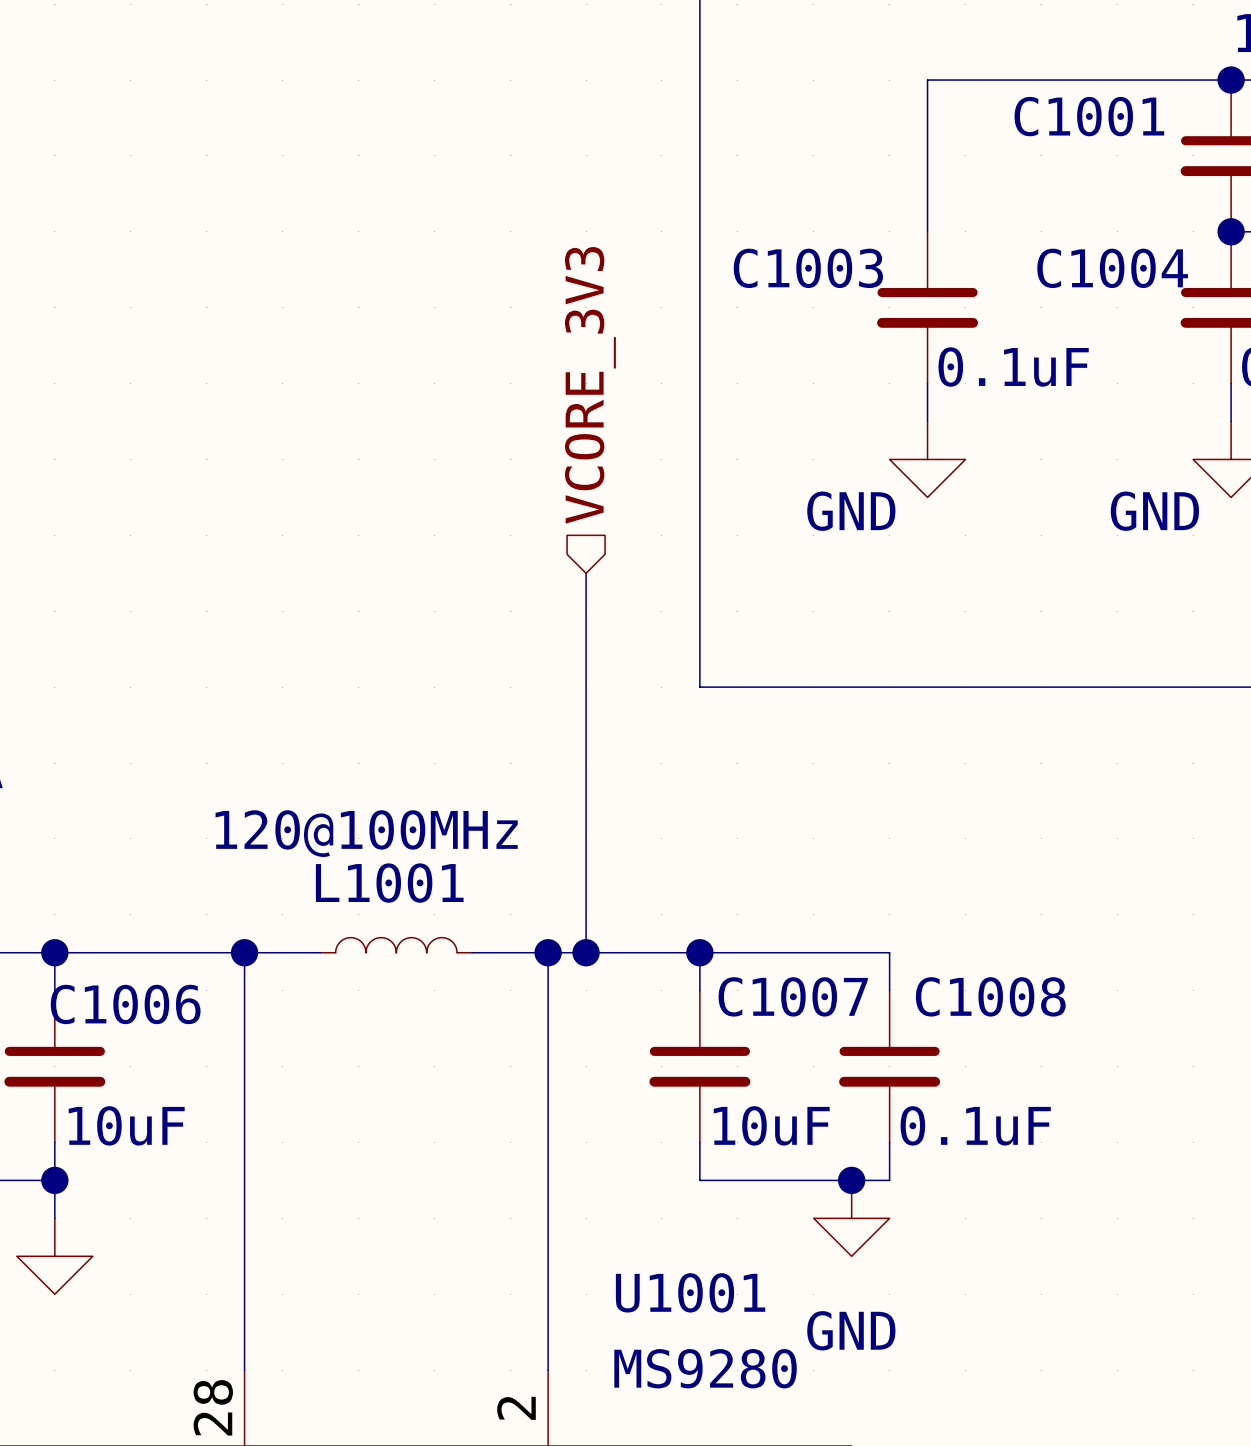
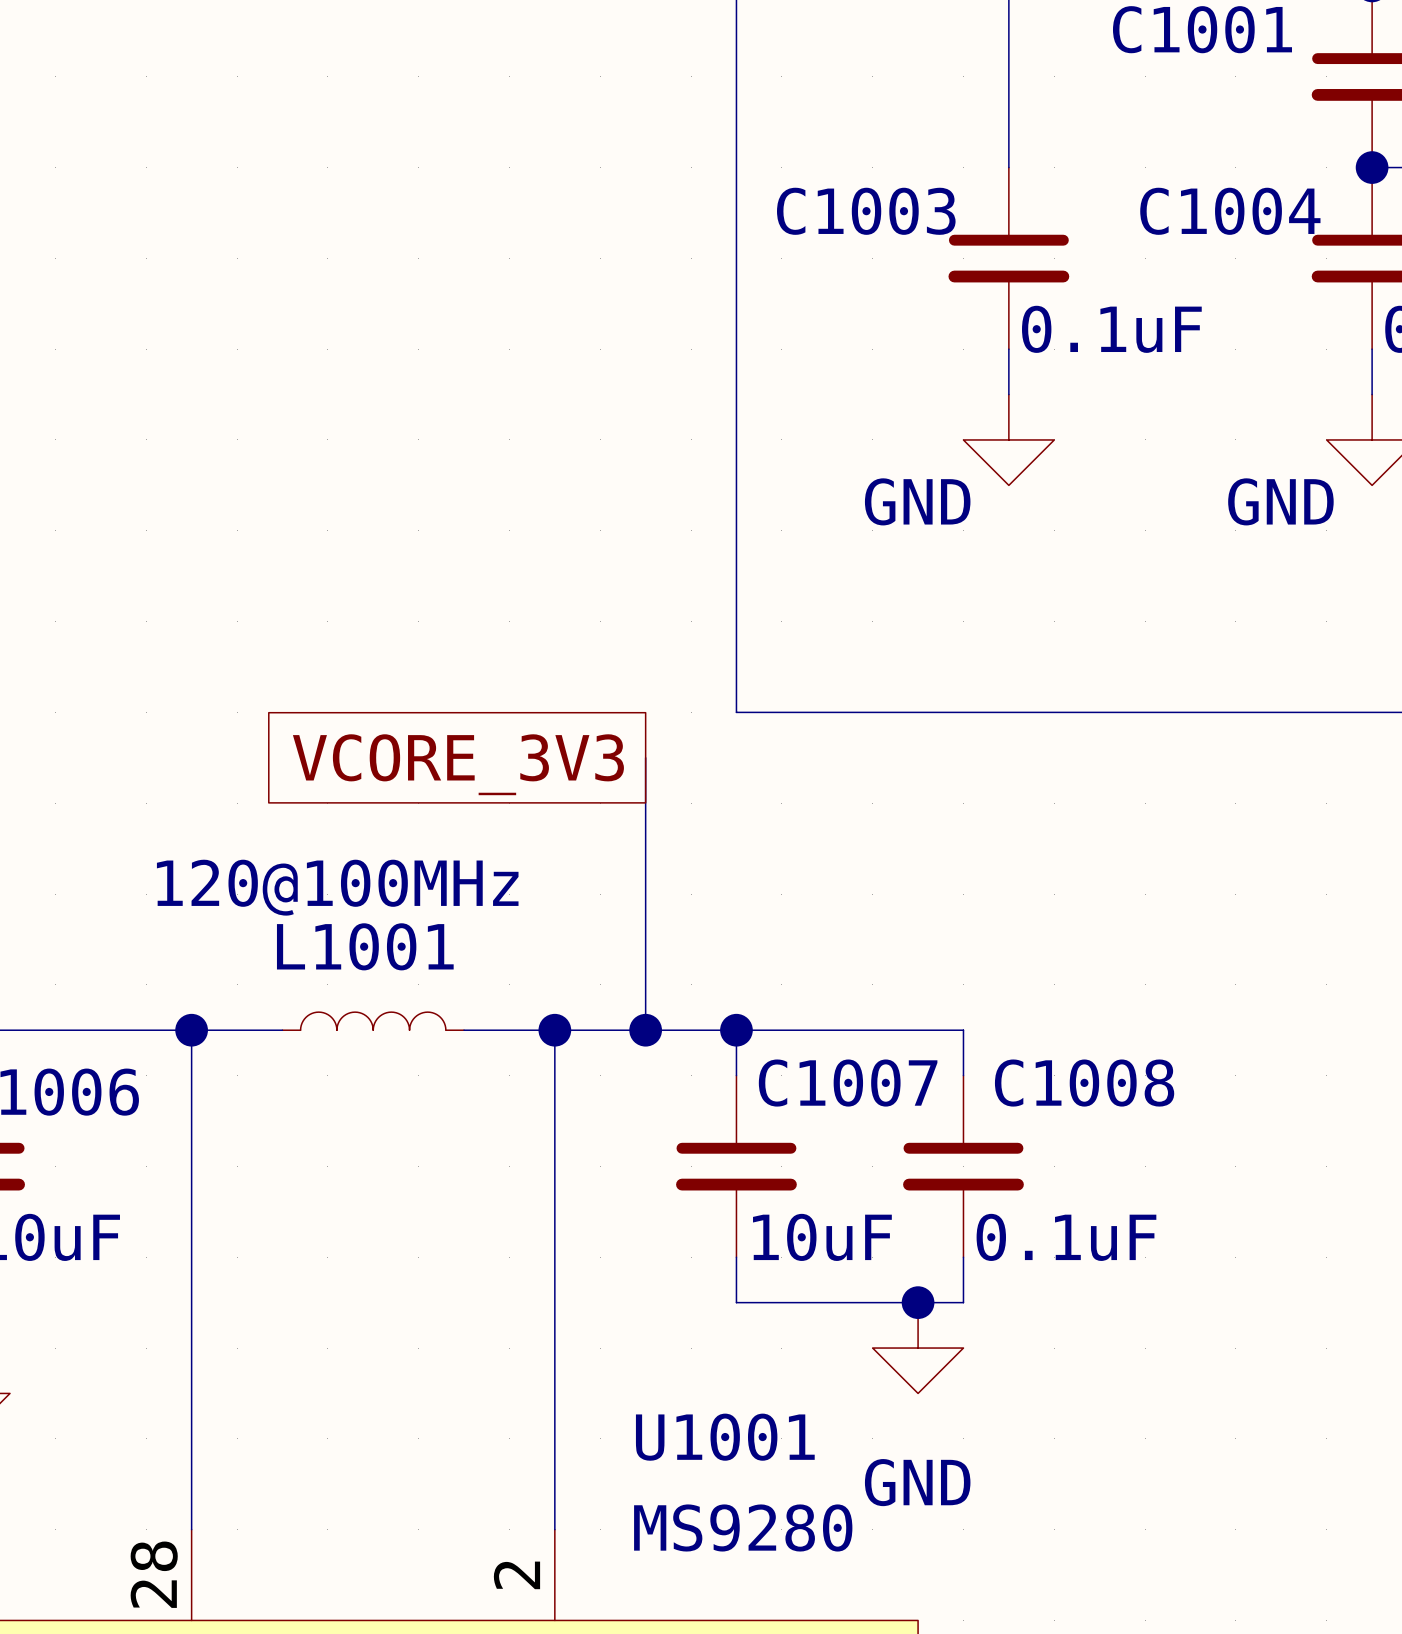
hierarchical label: VCORE_3V3 (590, 385) -> none
wire: (586, 573) (586, 952) -> none
wire: none -> (645, 757) (645, 1030)
global label: none -> VCORE_3V3 (458, 764)
junction position: (586, 952) -> (645, 1030)

